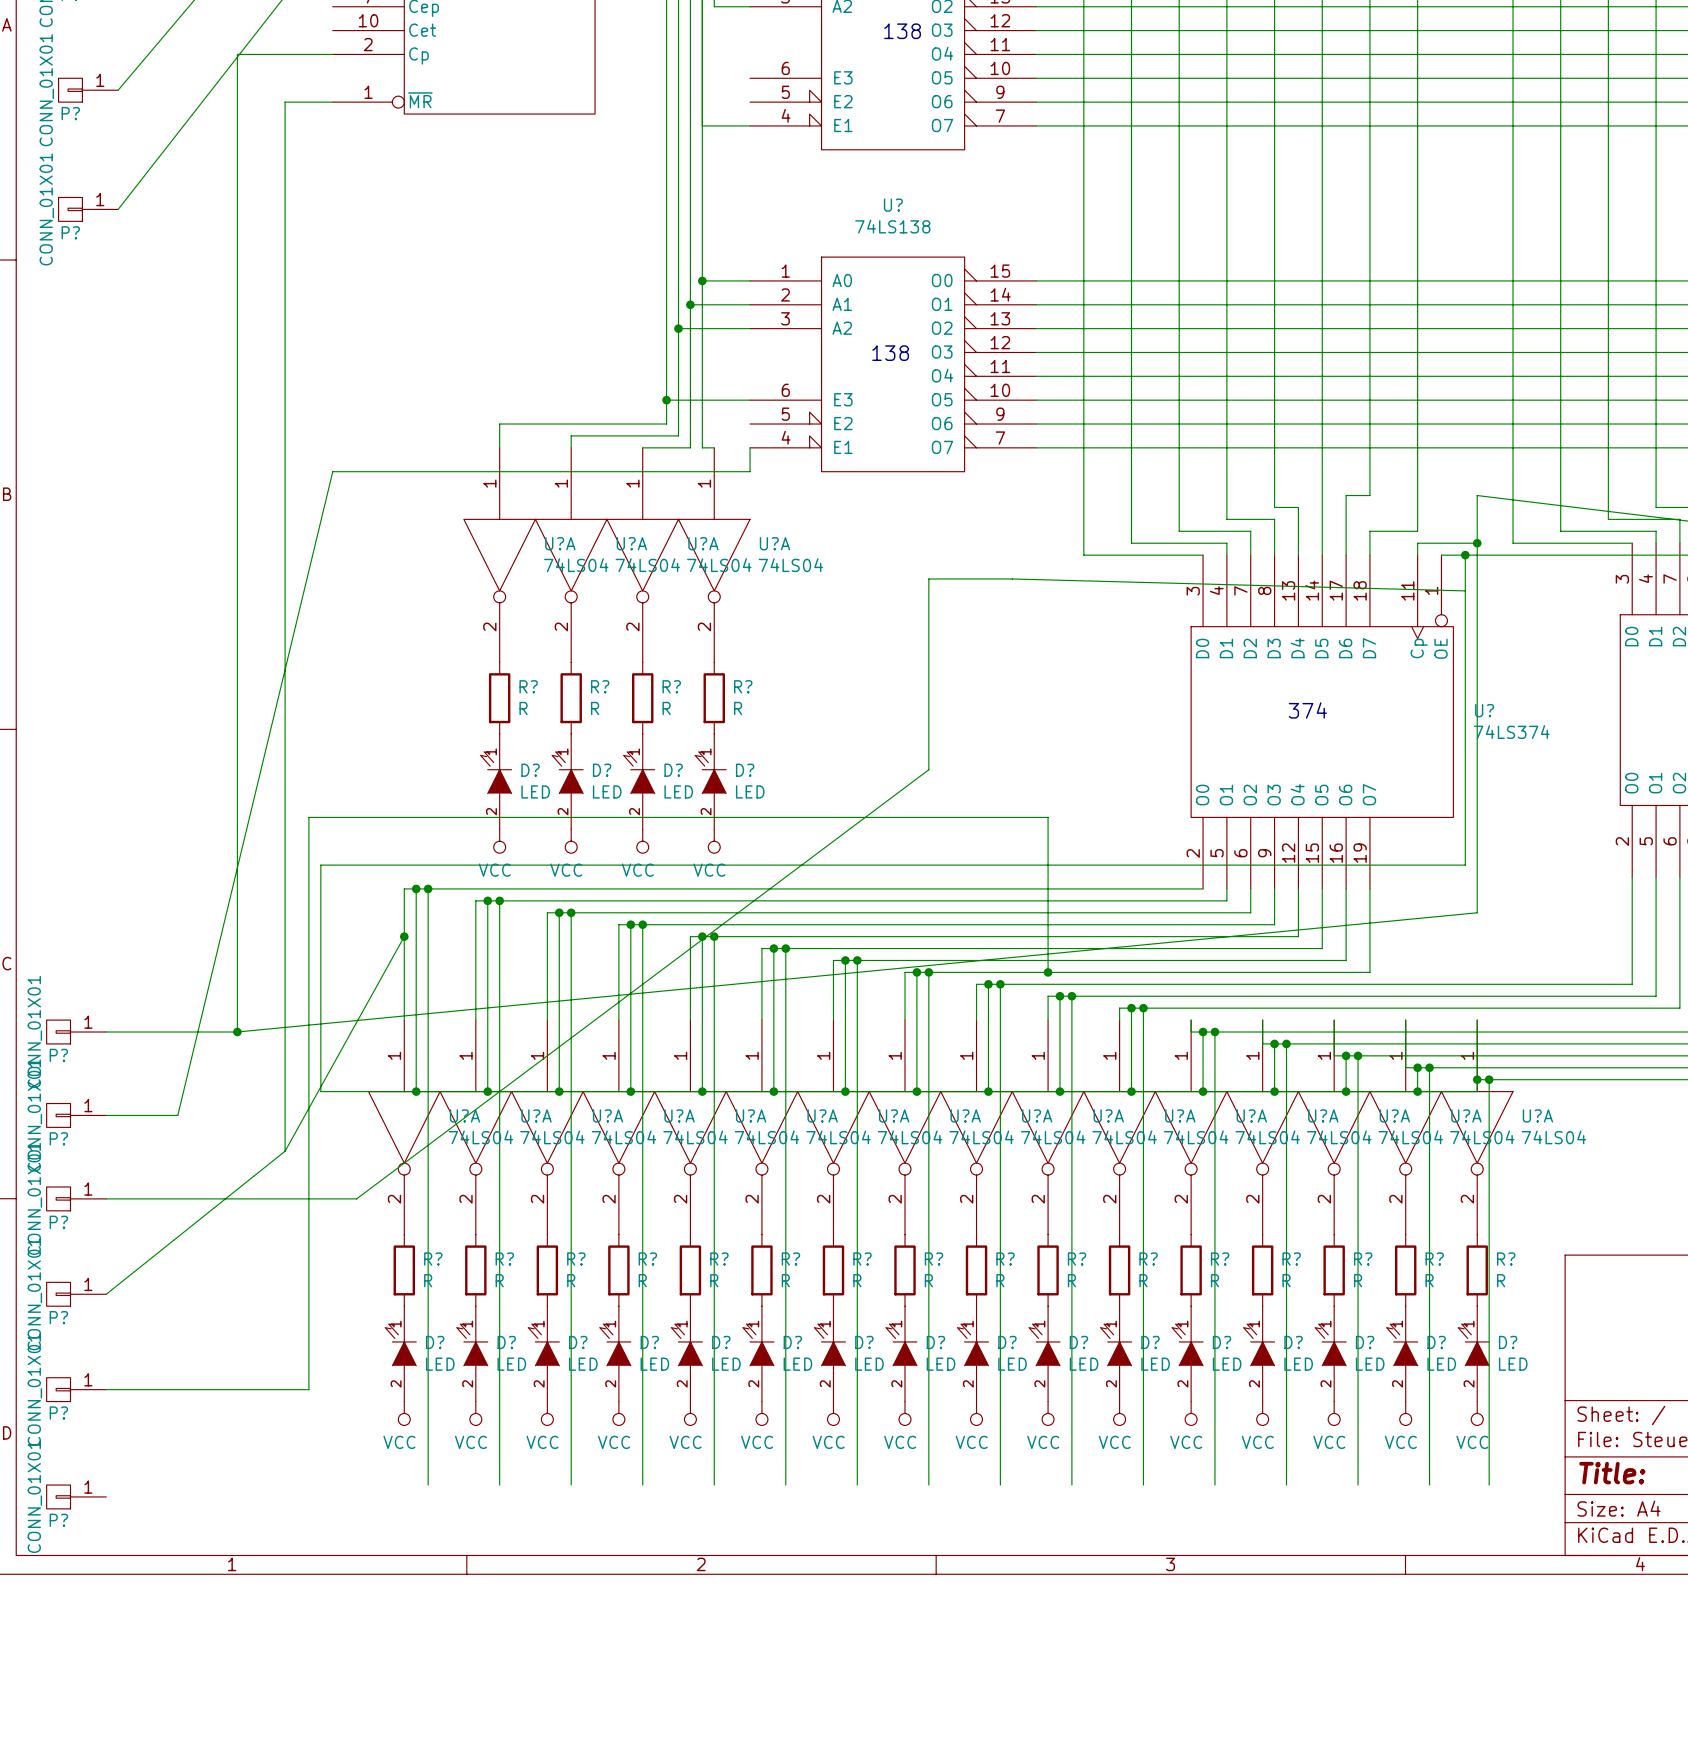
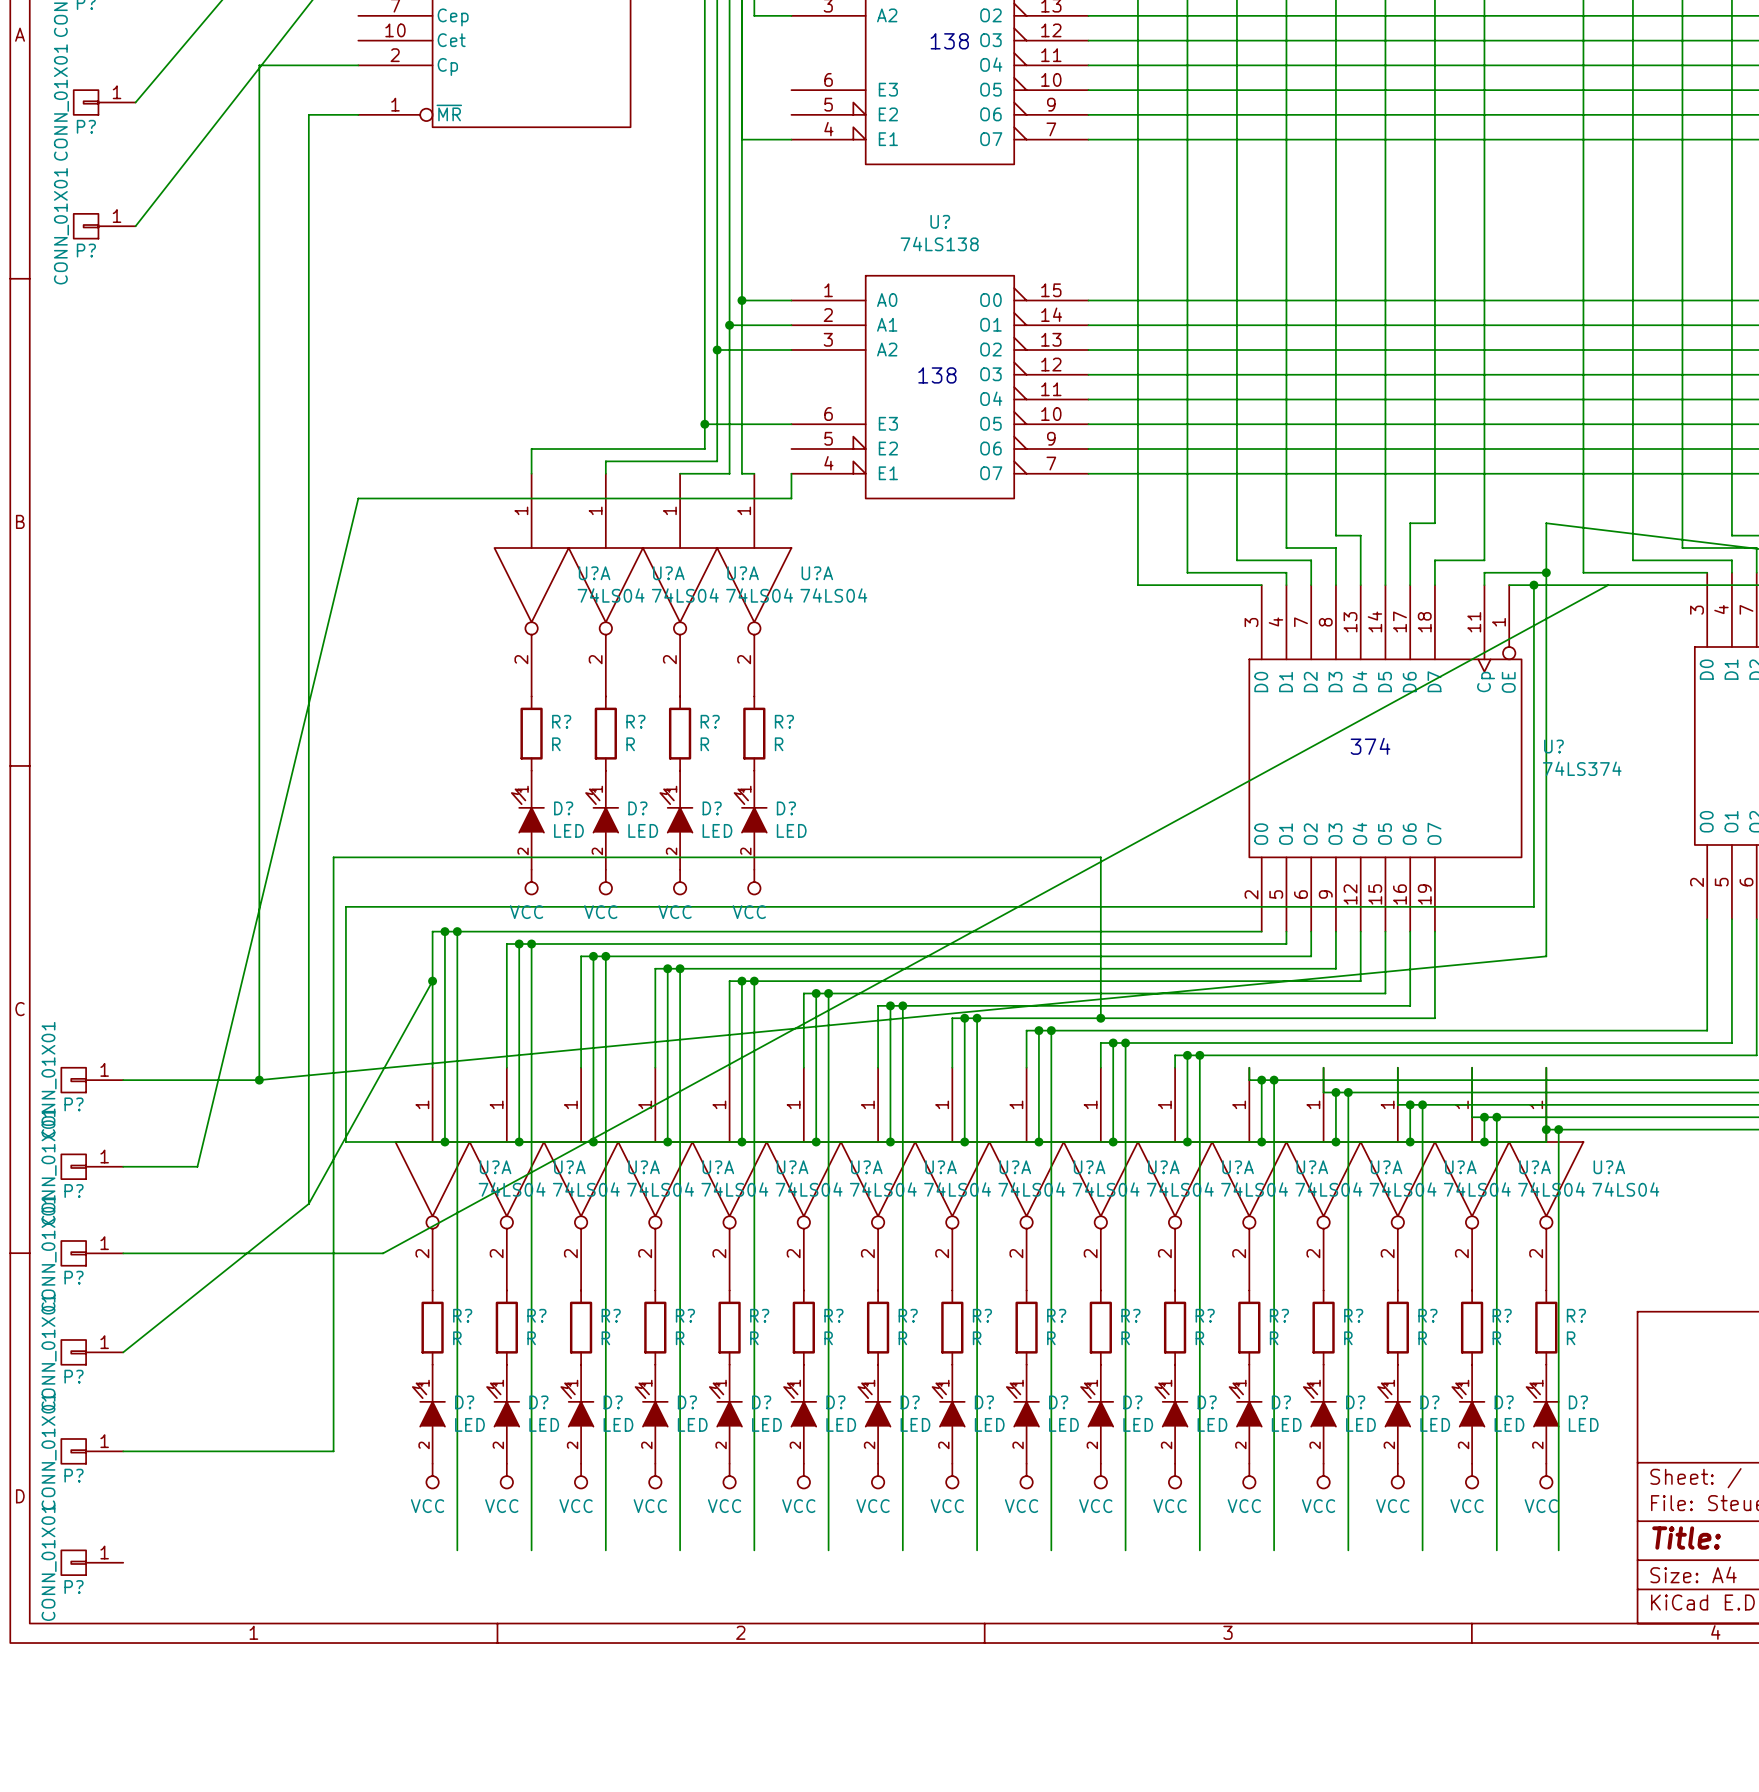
wire: (1465, 590) (1012, 578) (928, 578) (928, 769) (356, 1198) -> (1608, 585) (383, 1253)

